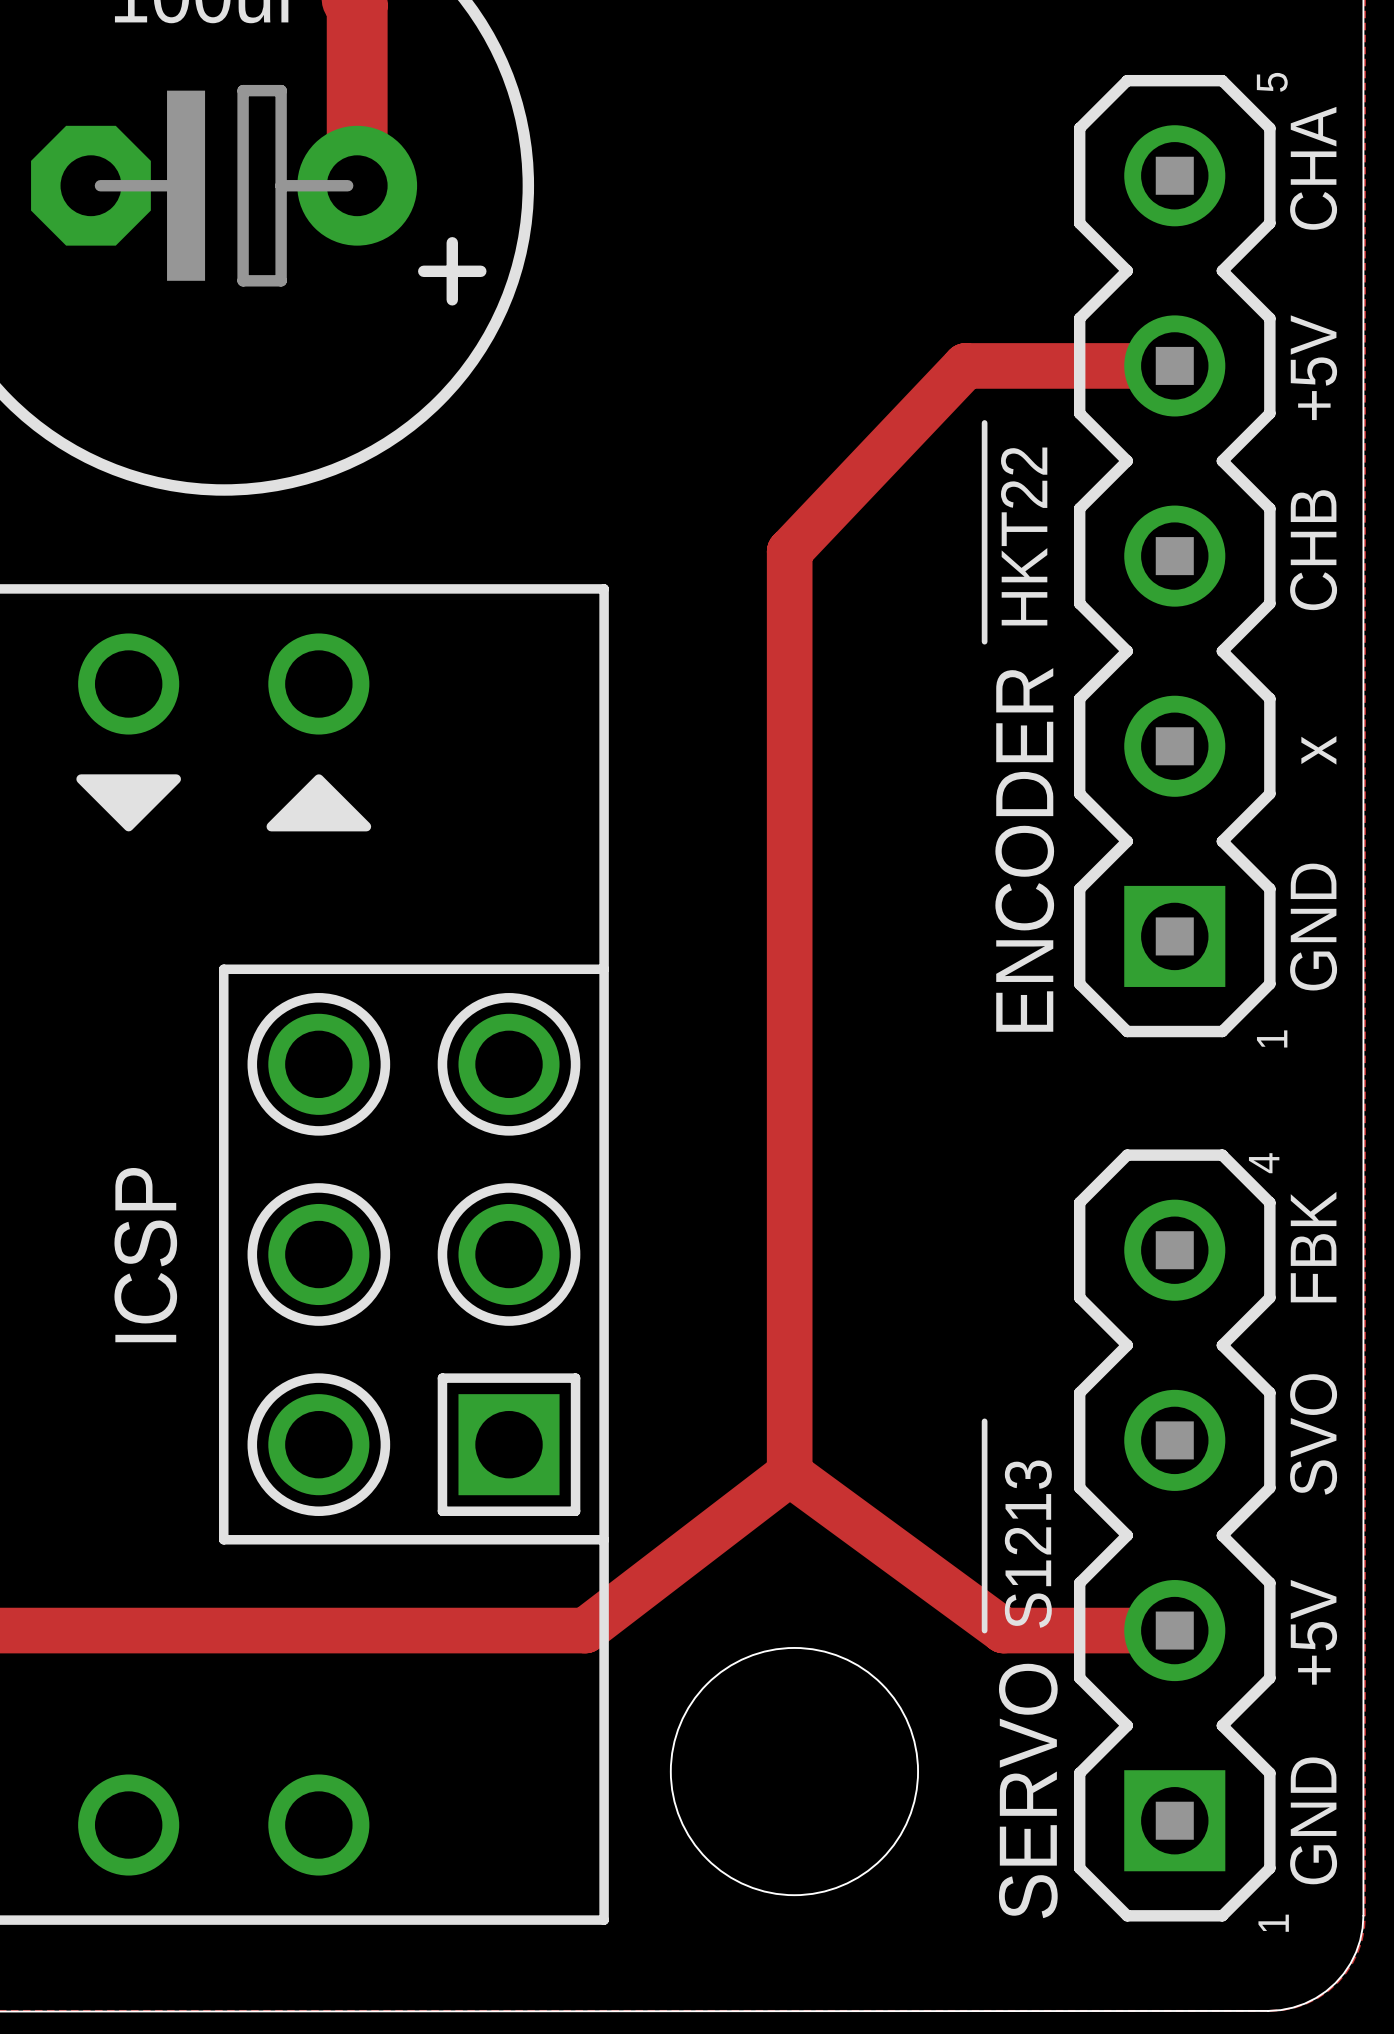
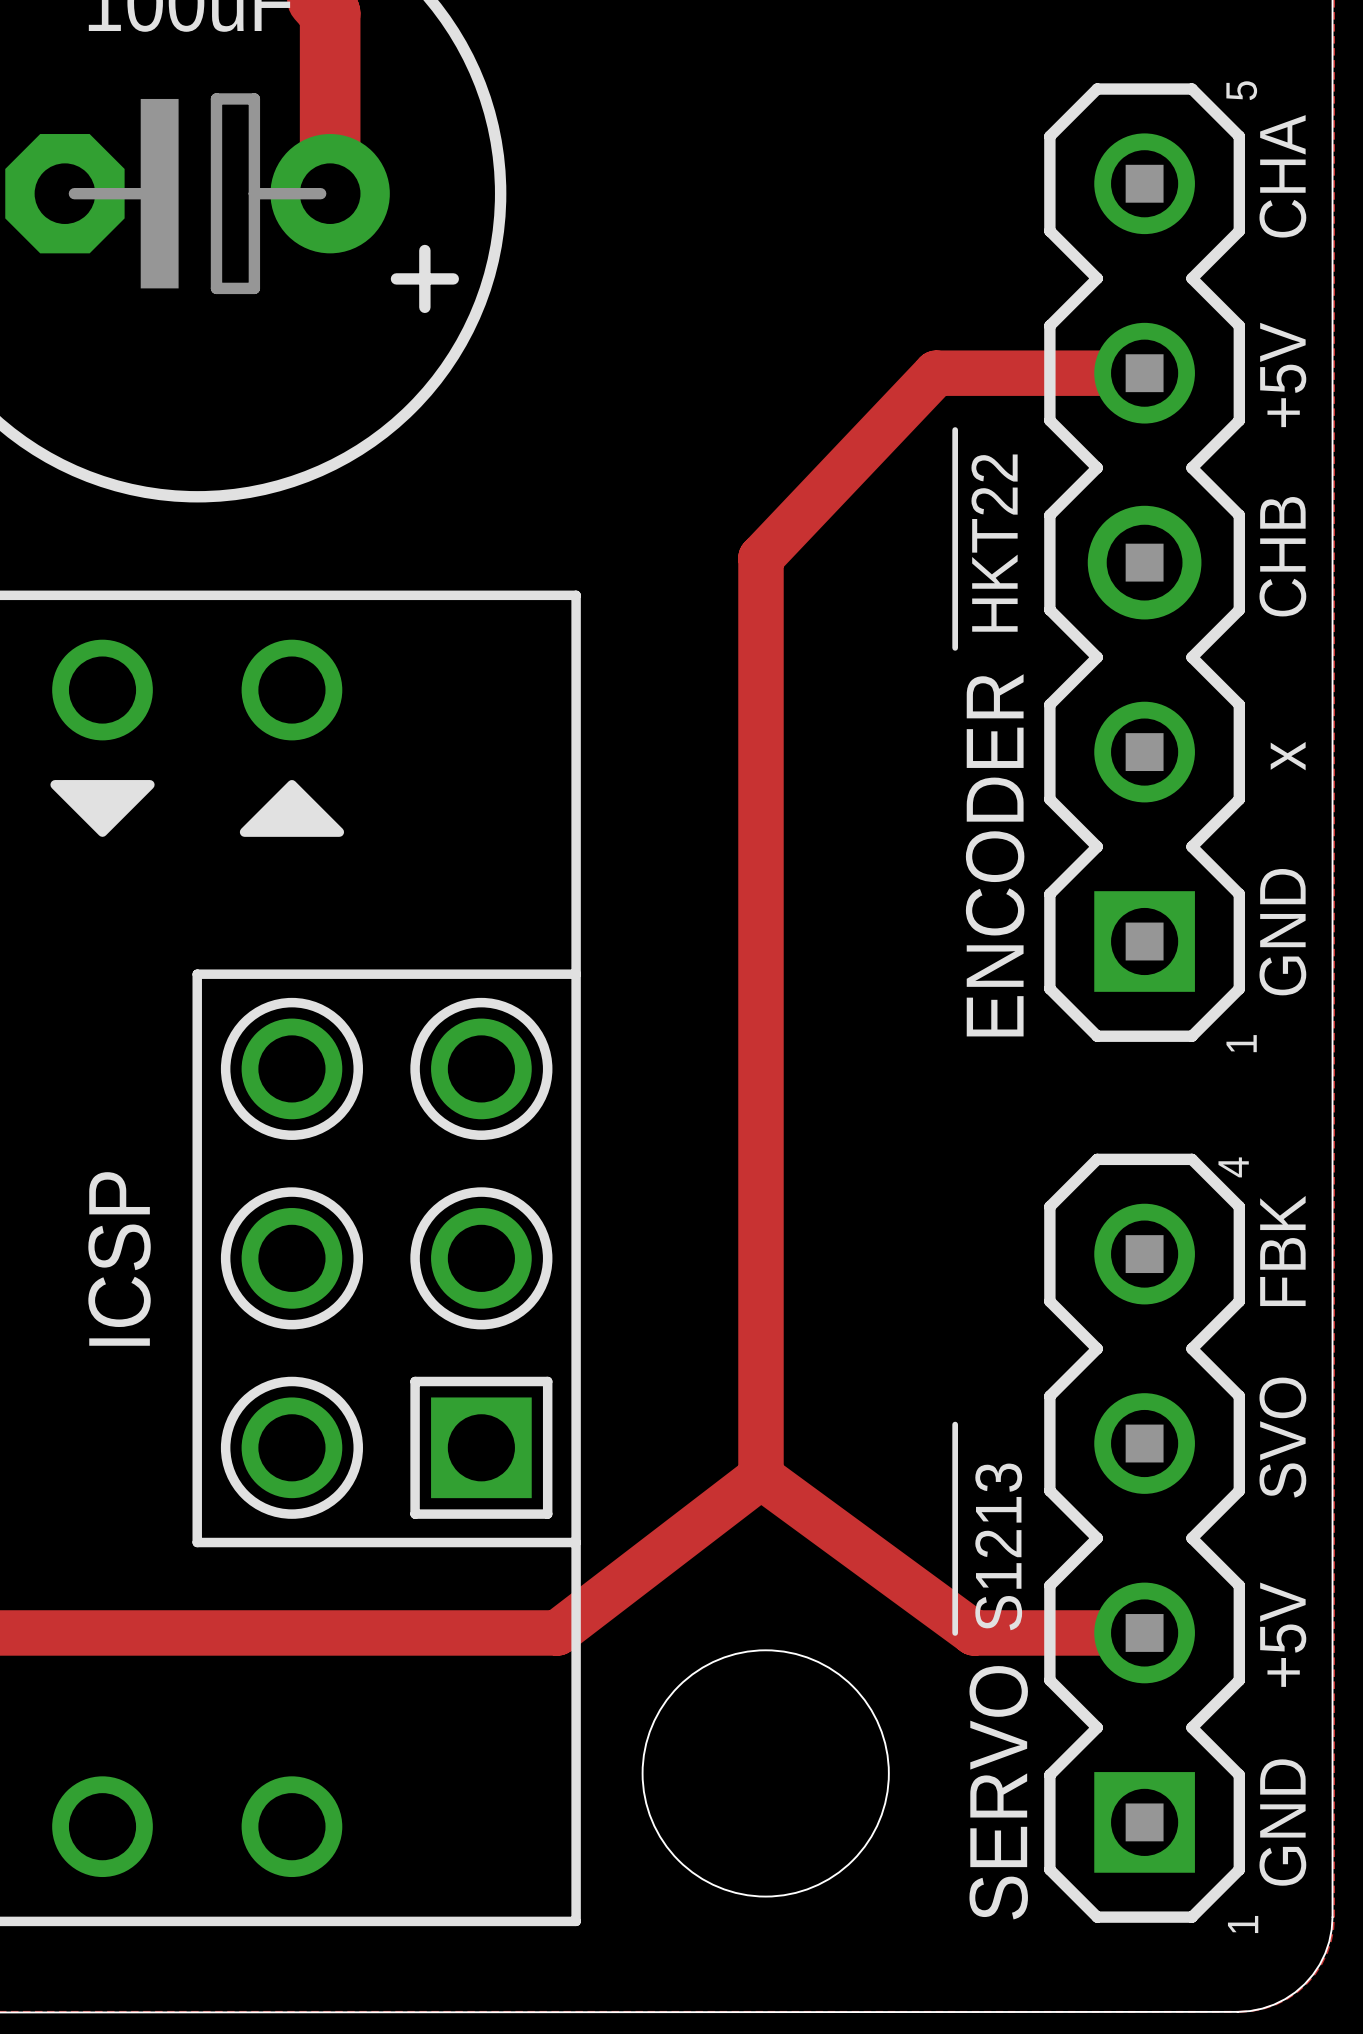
ENCODER footprint: [1073, 74, 1276, 1038] -> [1044, 83, 1246, 1042]

